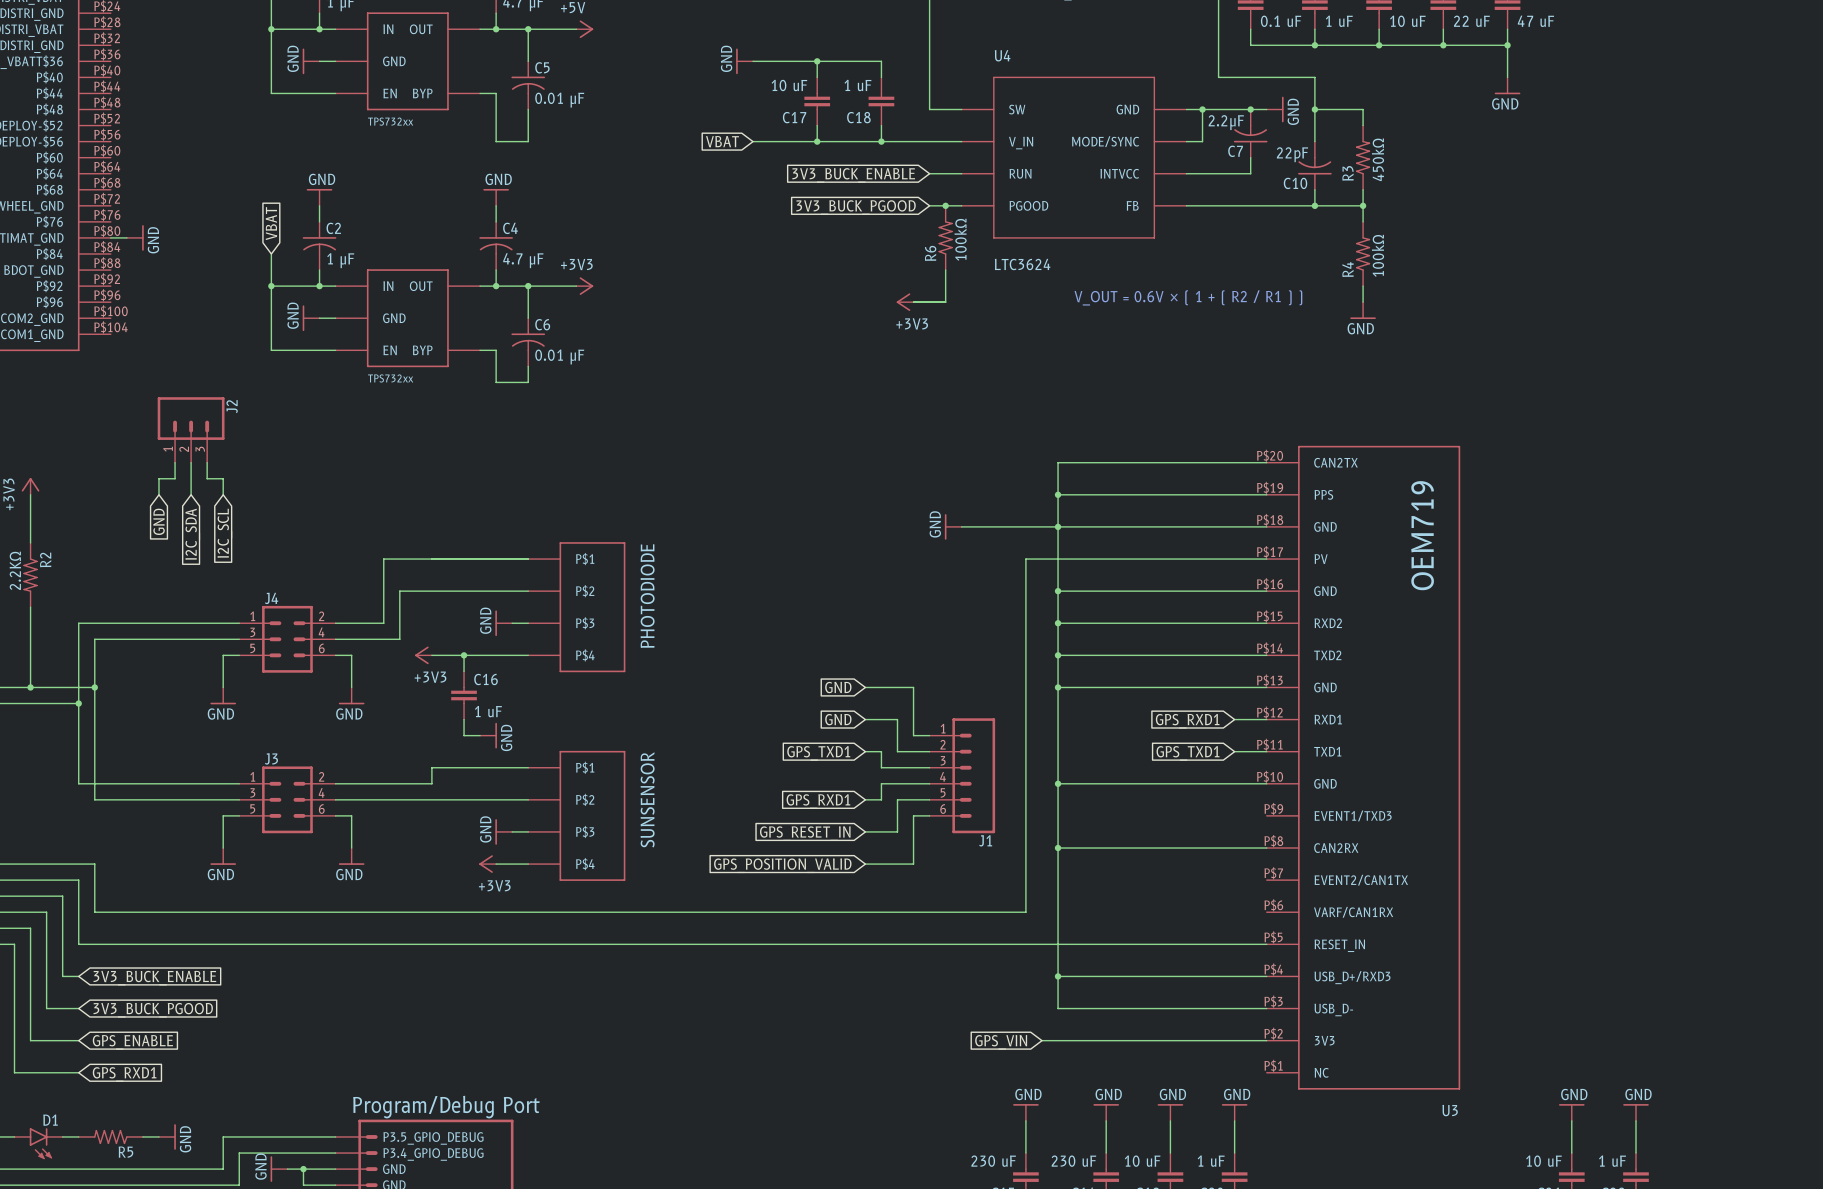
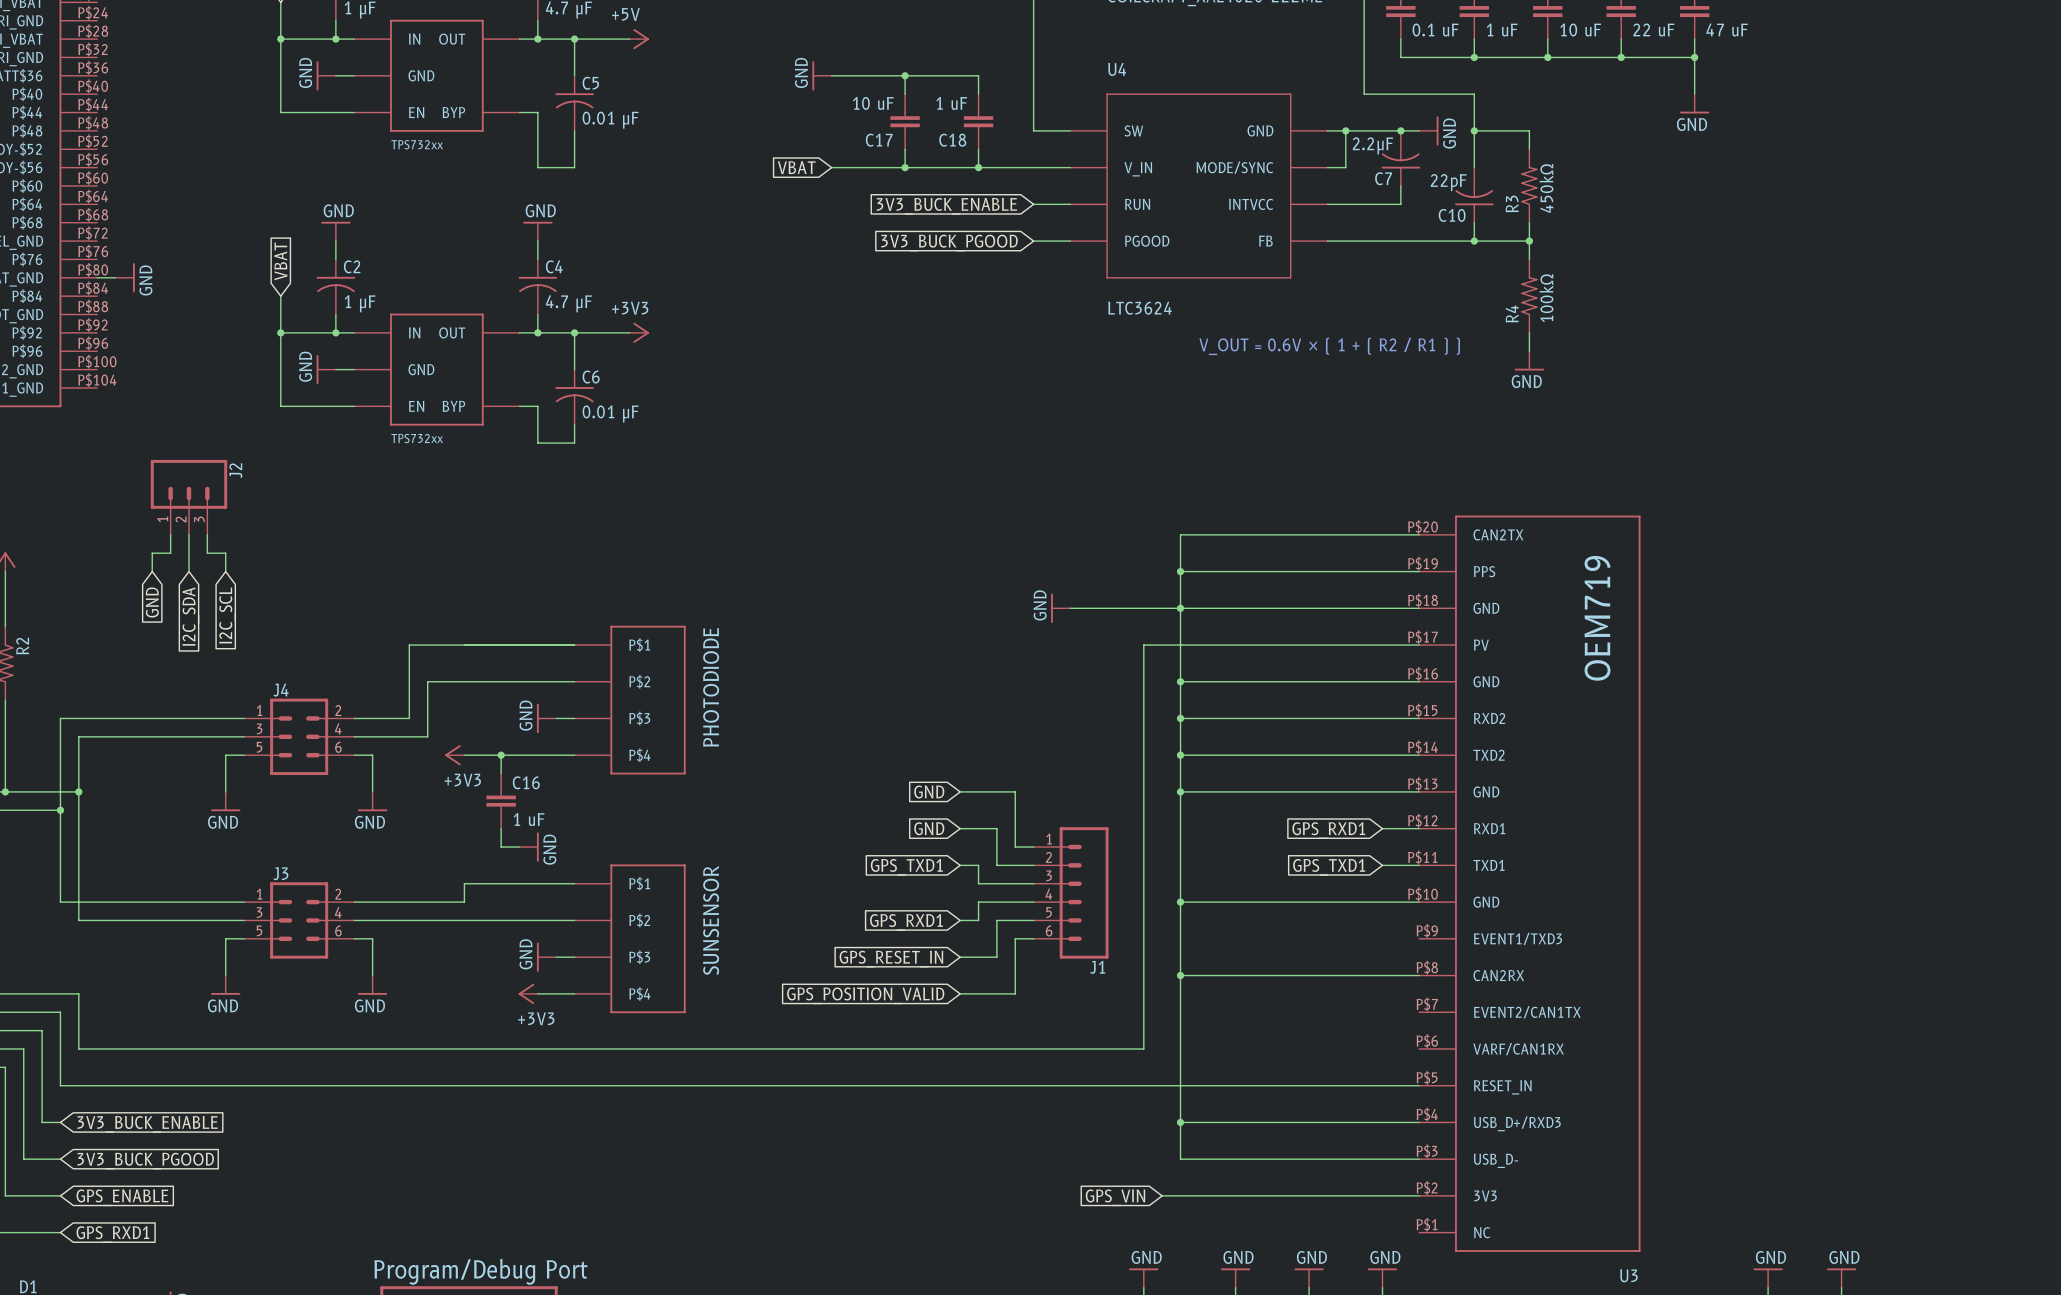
junction: (945, 205) -> none
R6: 100kΩ (945, 237) -> none
wire: (945, 270) (945, 302) (913, 302) -> none
power symbol: +3V3 (905, 302) -> none

